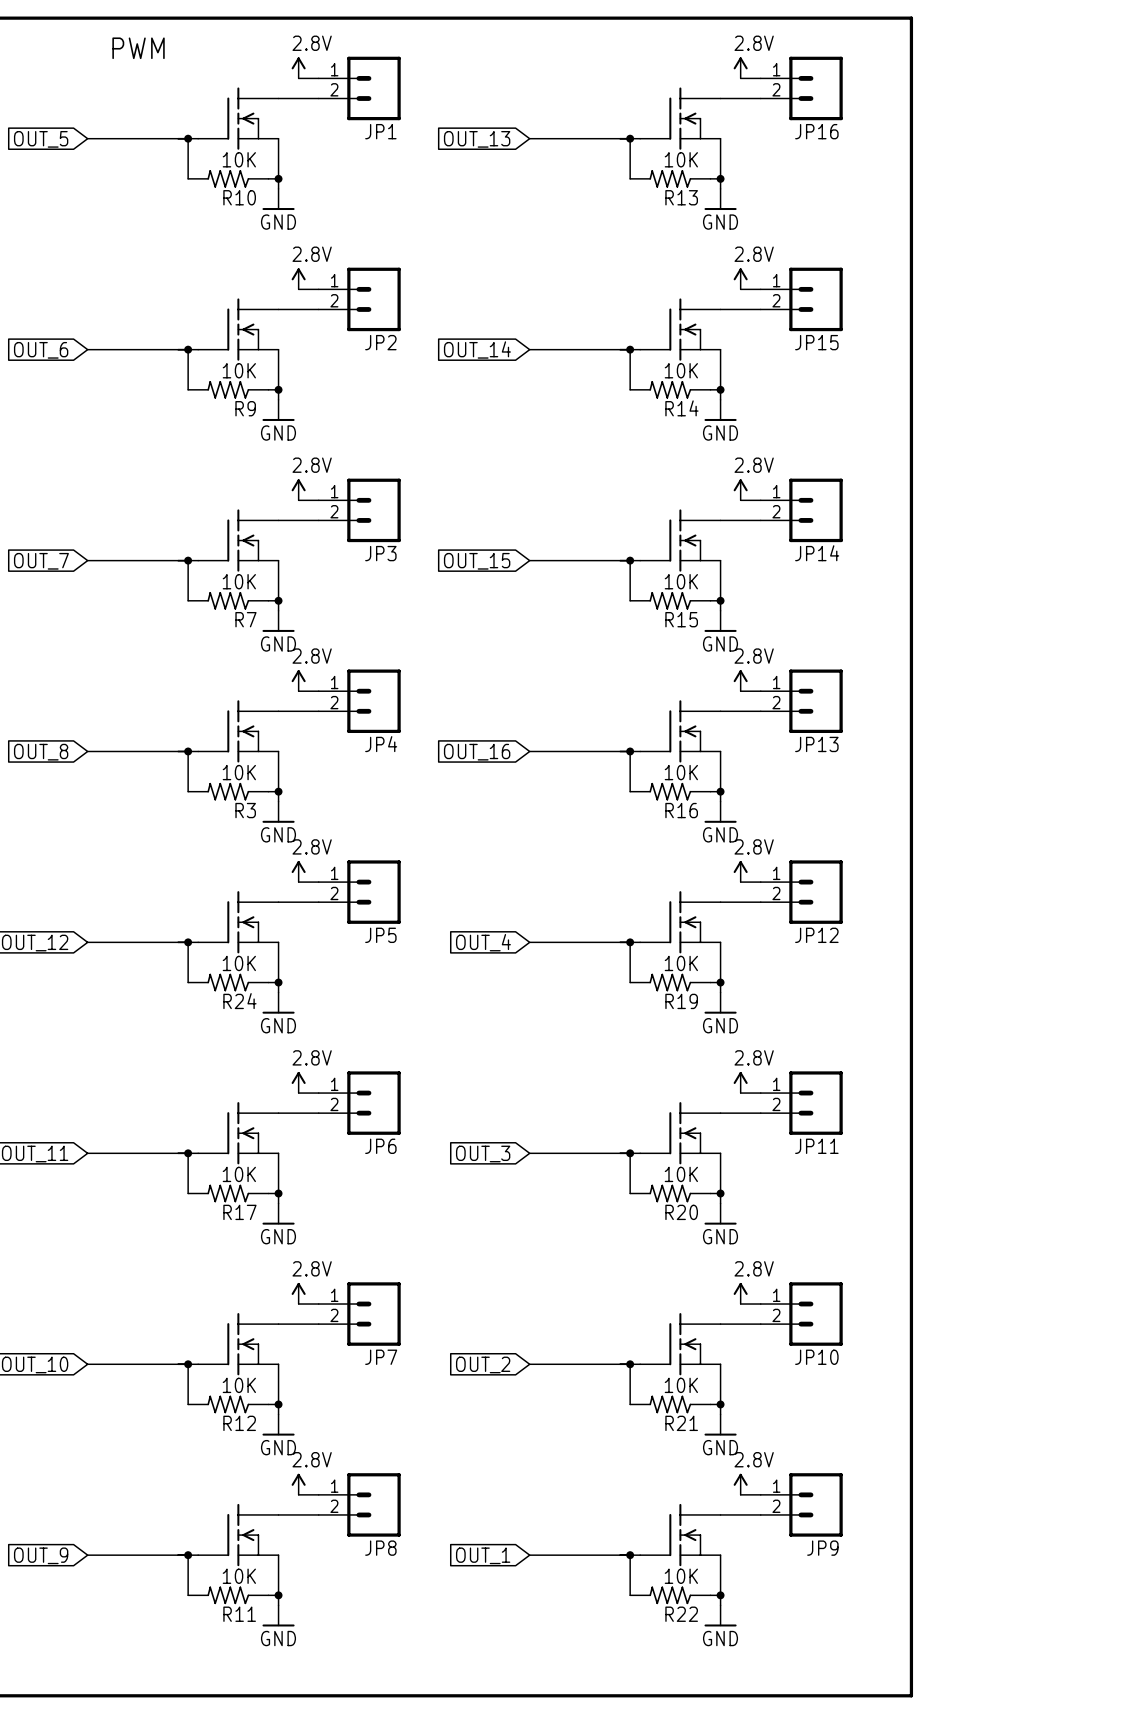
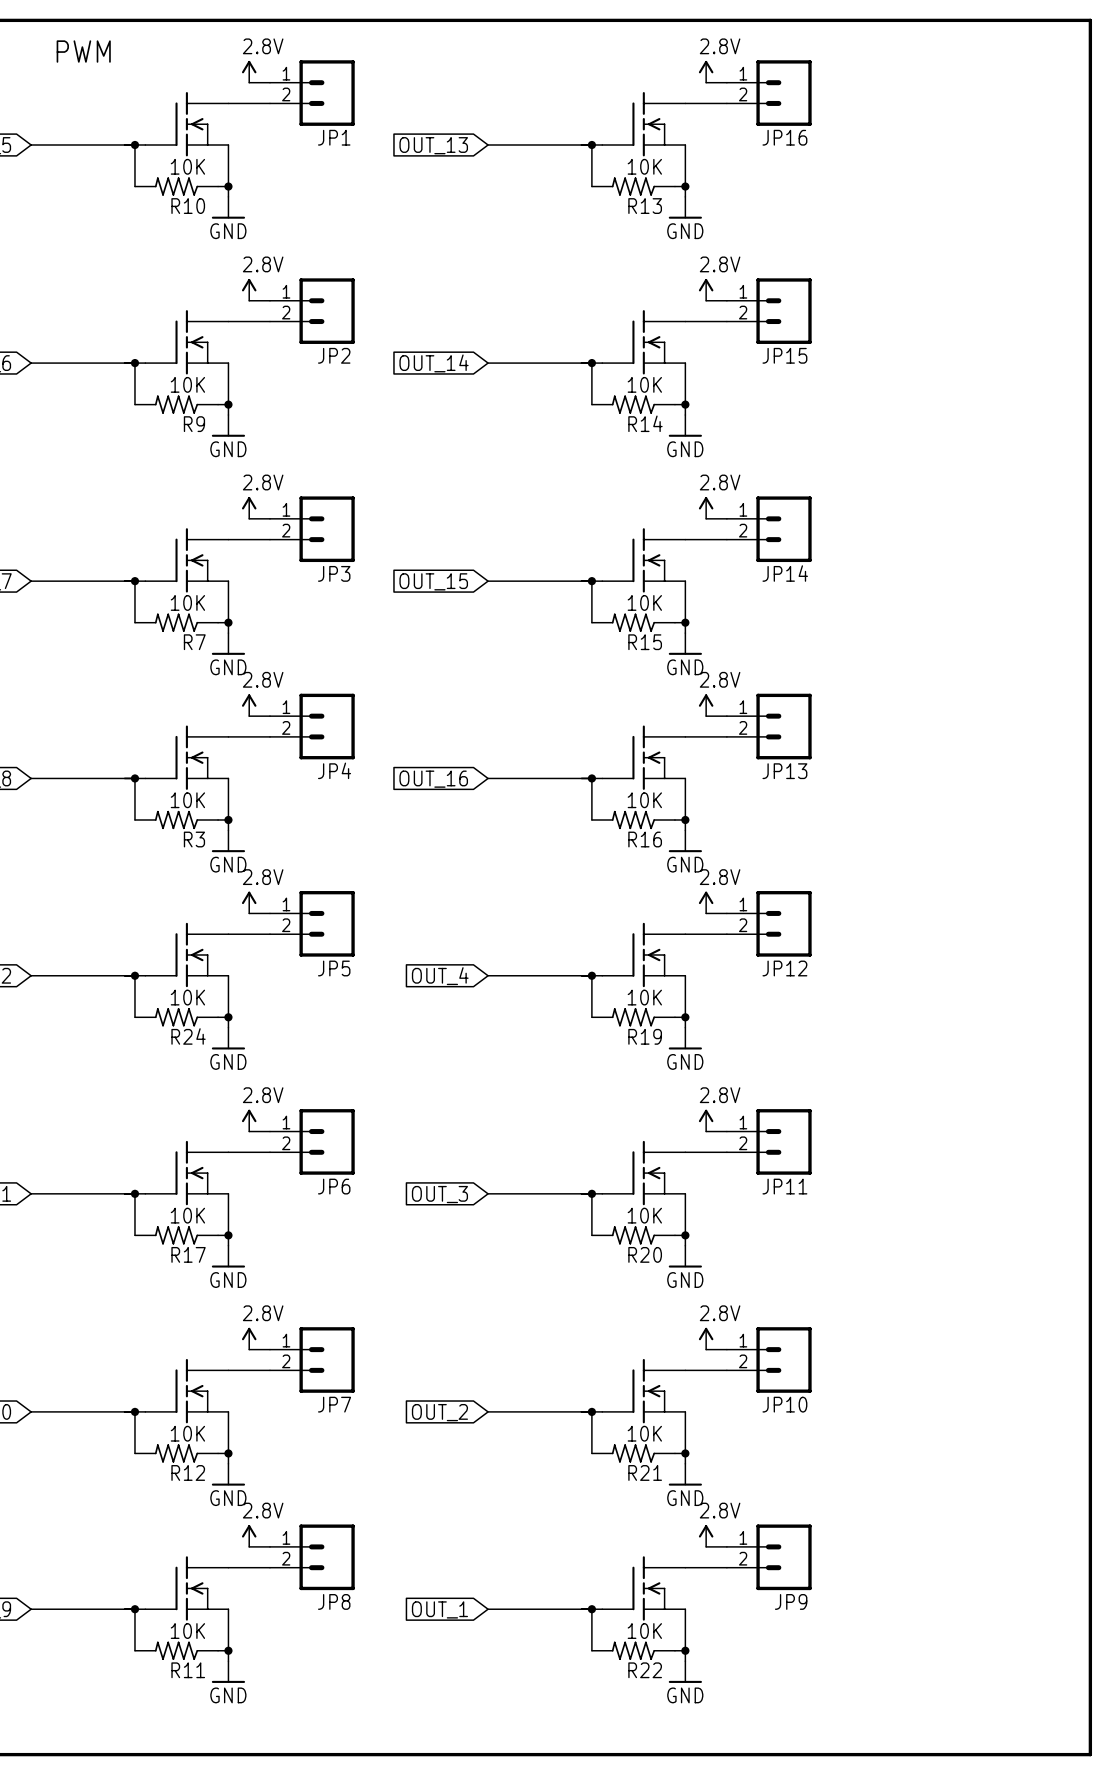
line: (911, 18) (911, 1695) -> (882, 20) (1090, 20) (1090, 1754) (882, 1754)

